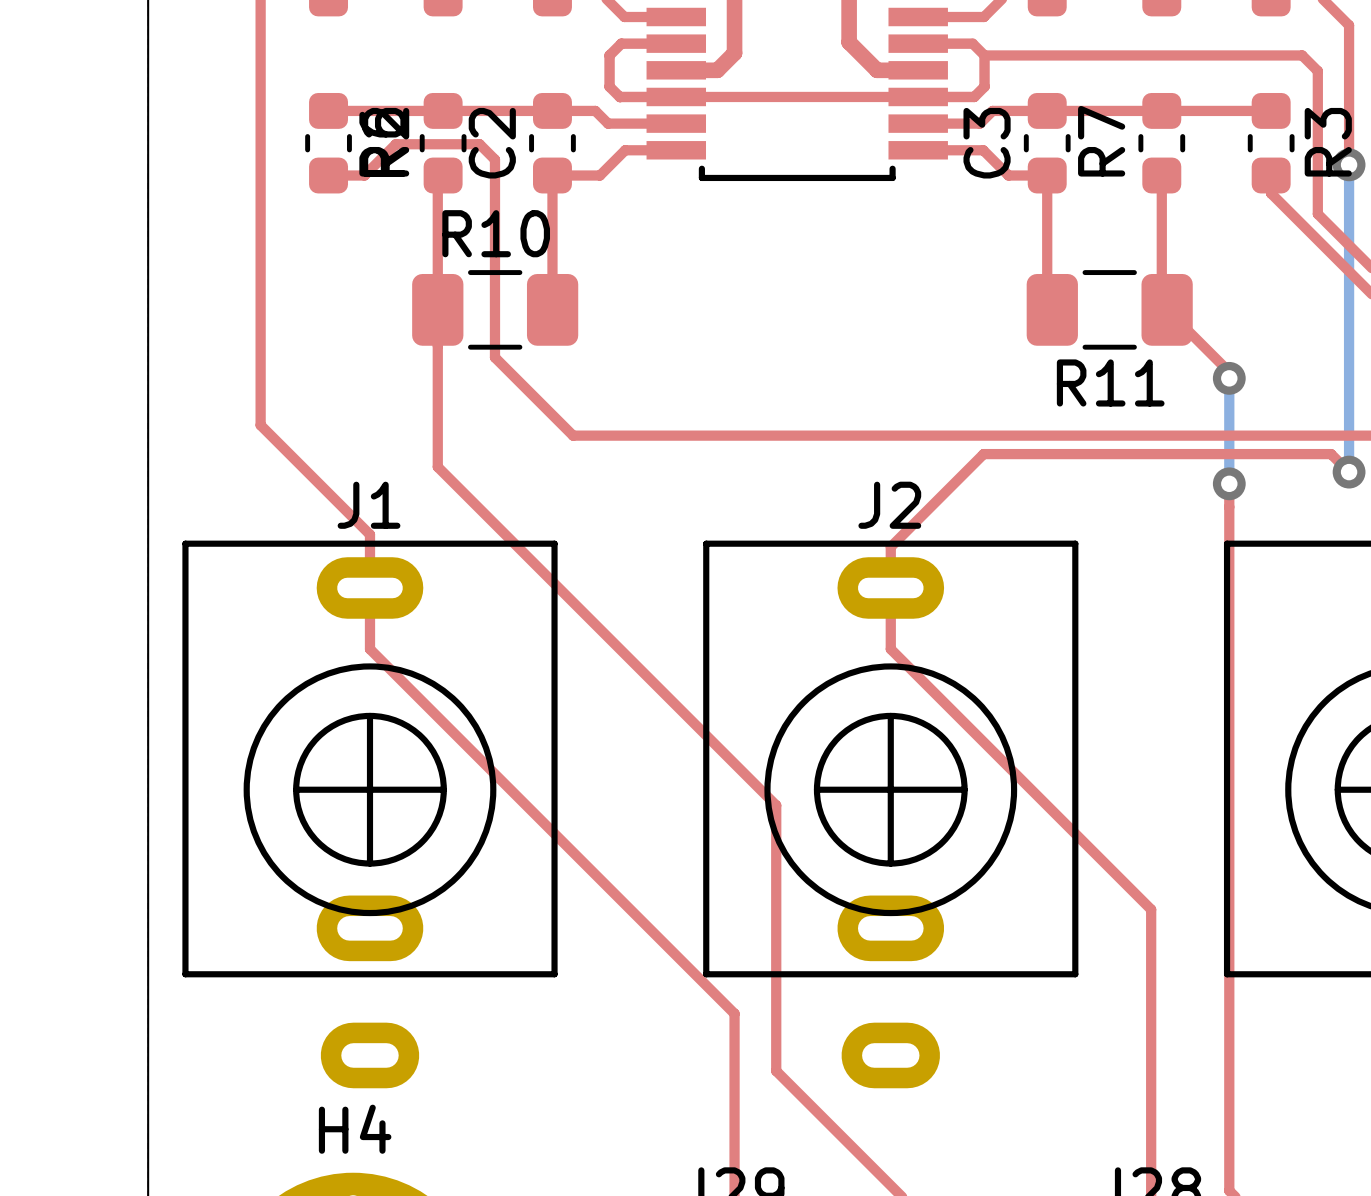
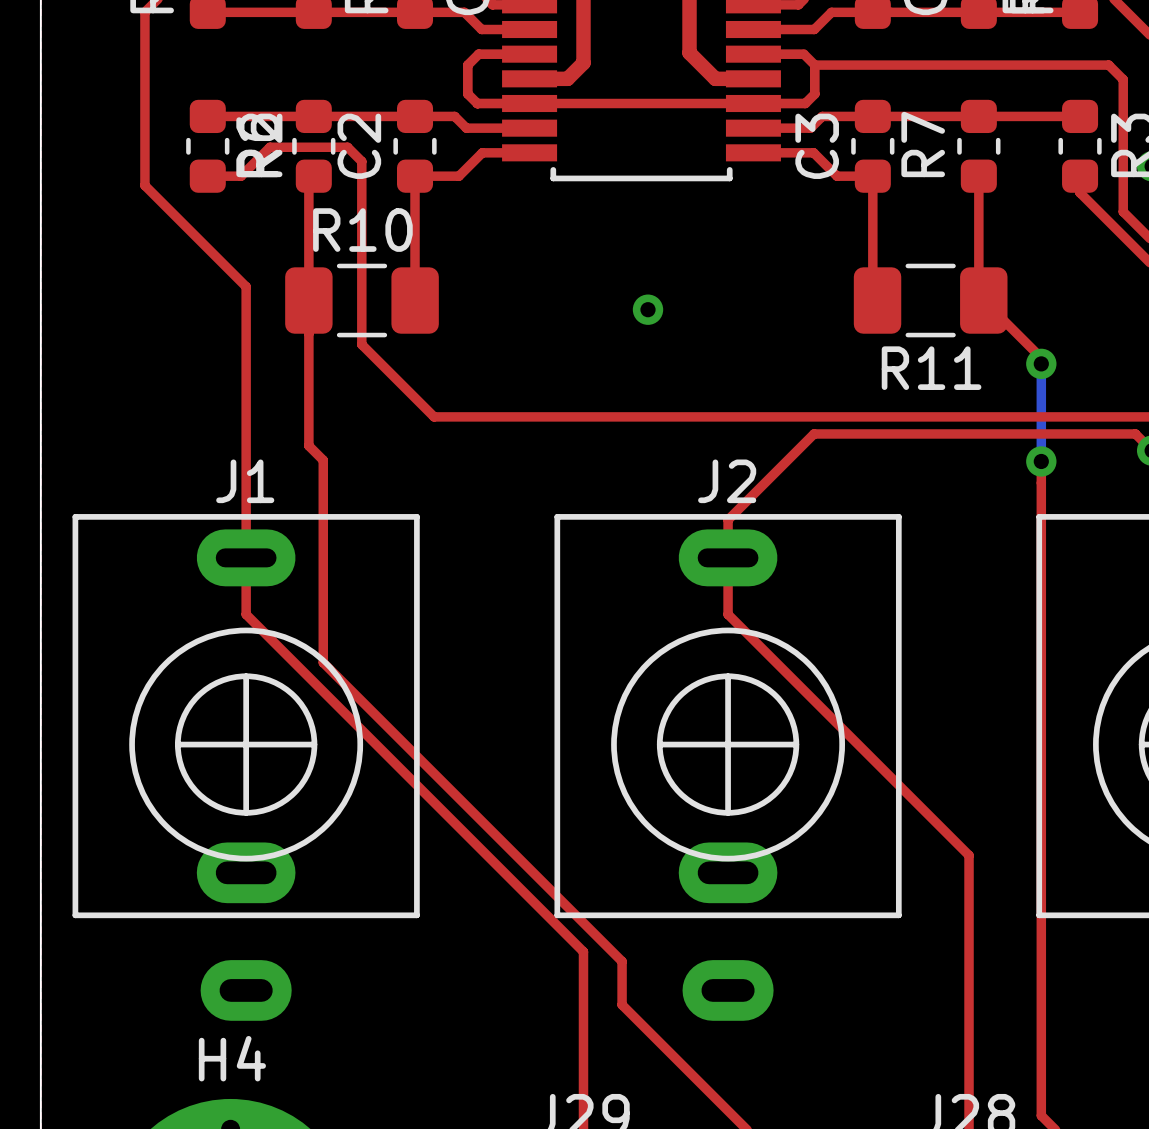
top track: (260, 185) (260, 425) (369, 534) -> (144, 185) (246, 286) (246, 508)
via: none -> (648, 309)
top track: (453, 482) (776, 805) (776, 1024) -> (323, 460) (323, 662) (622, 961)

